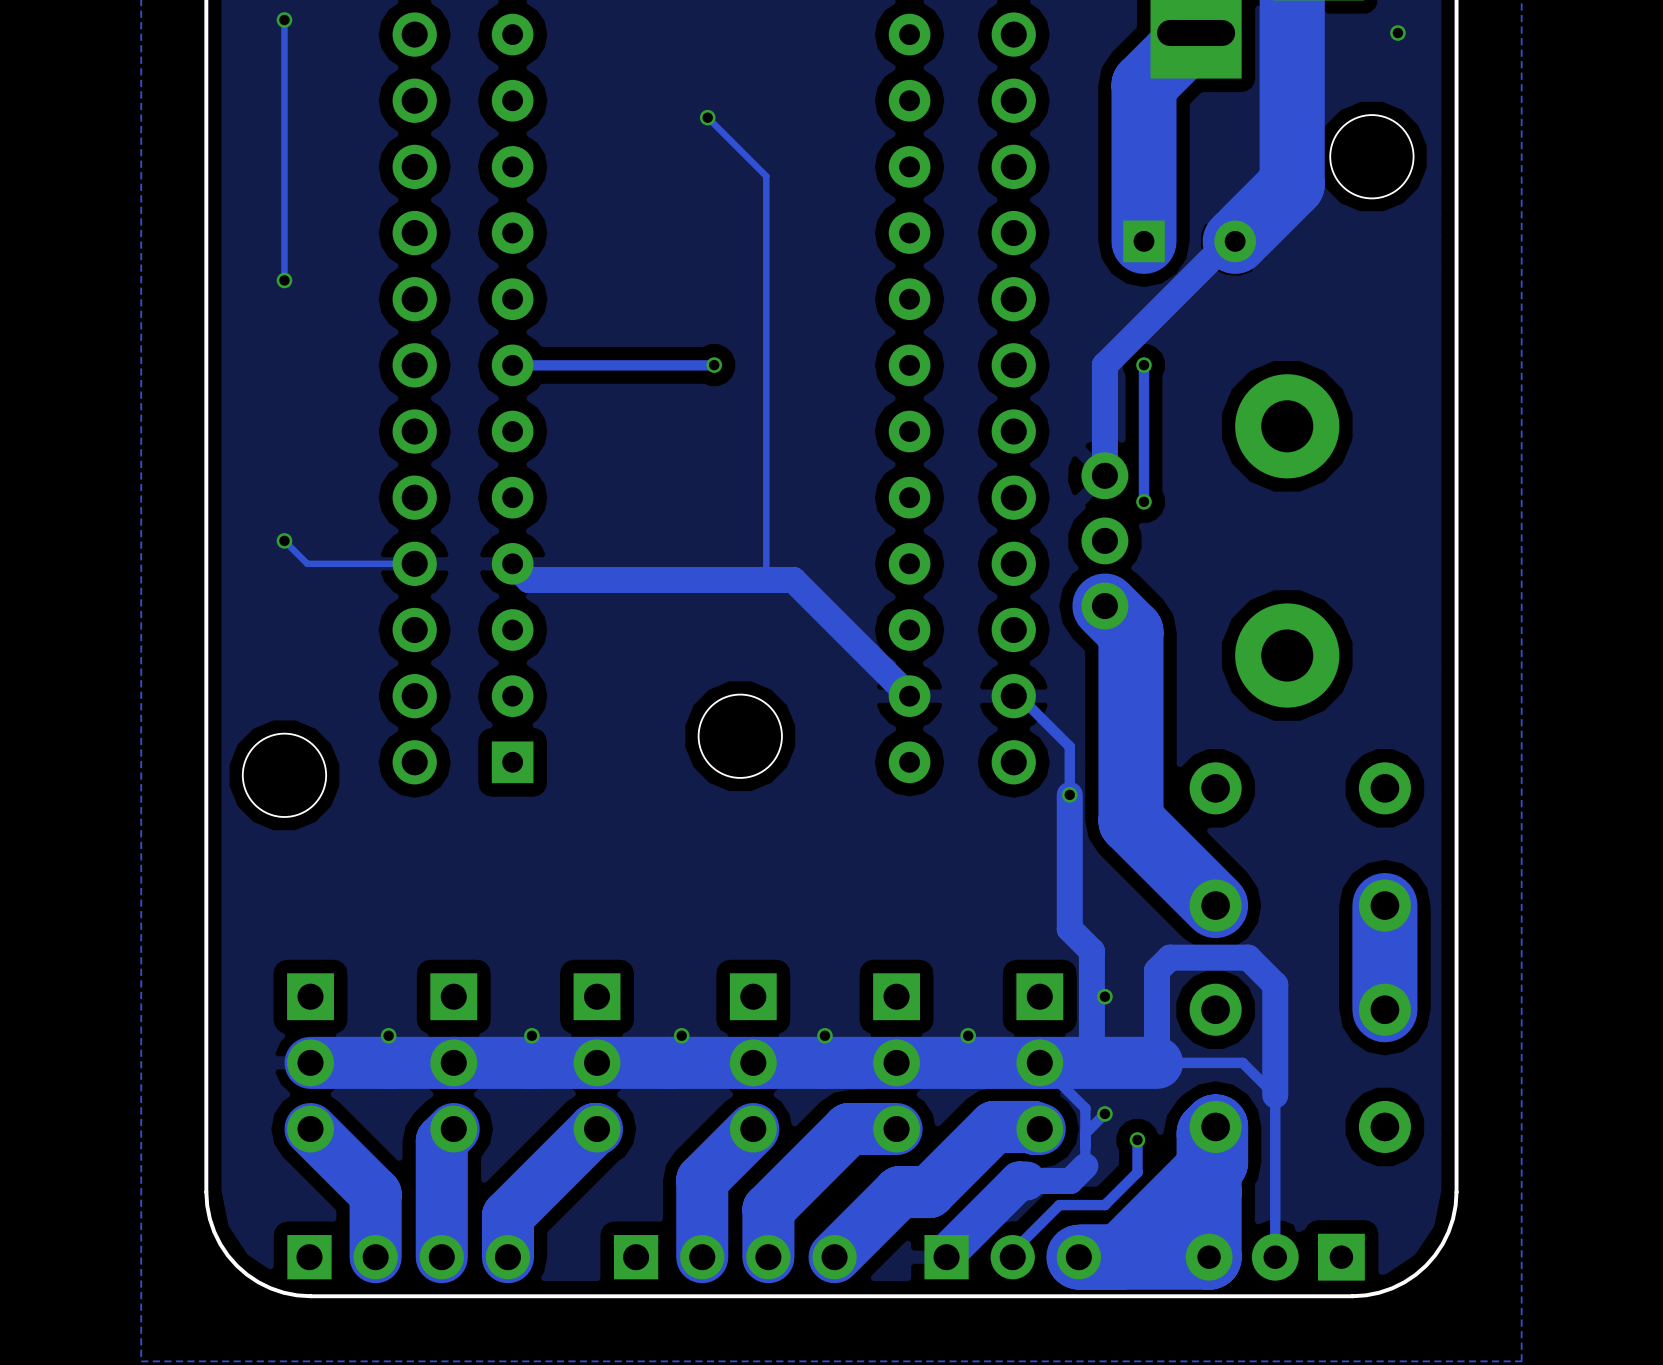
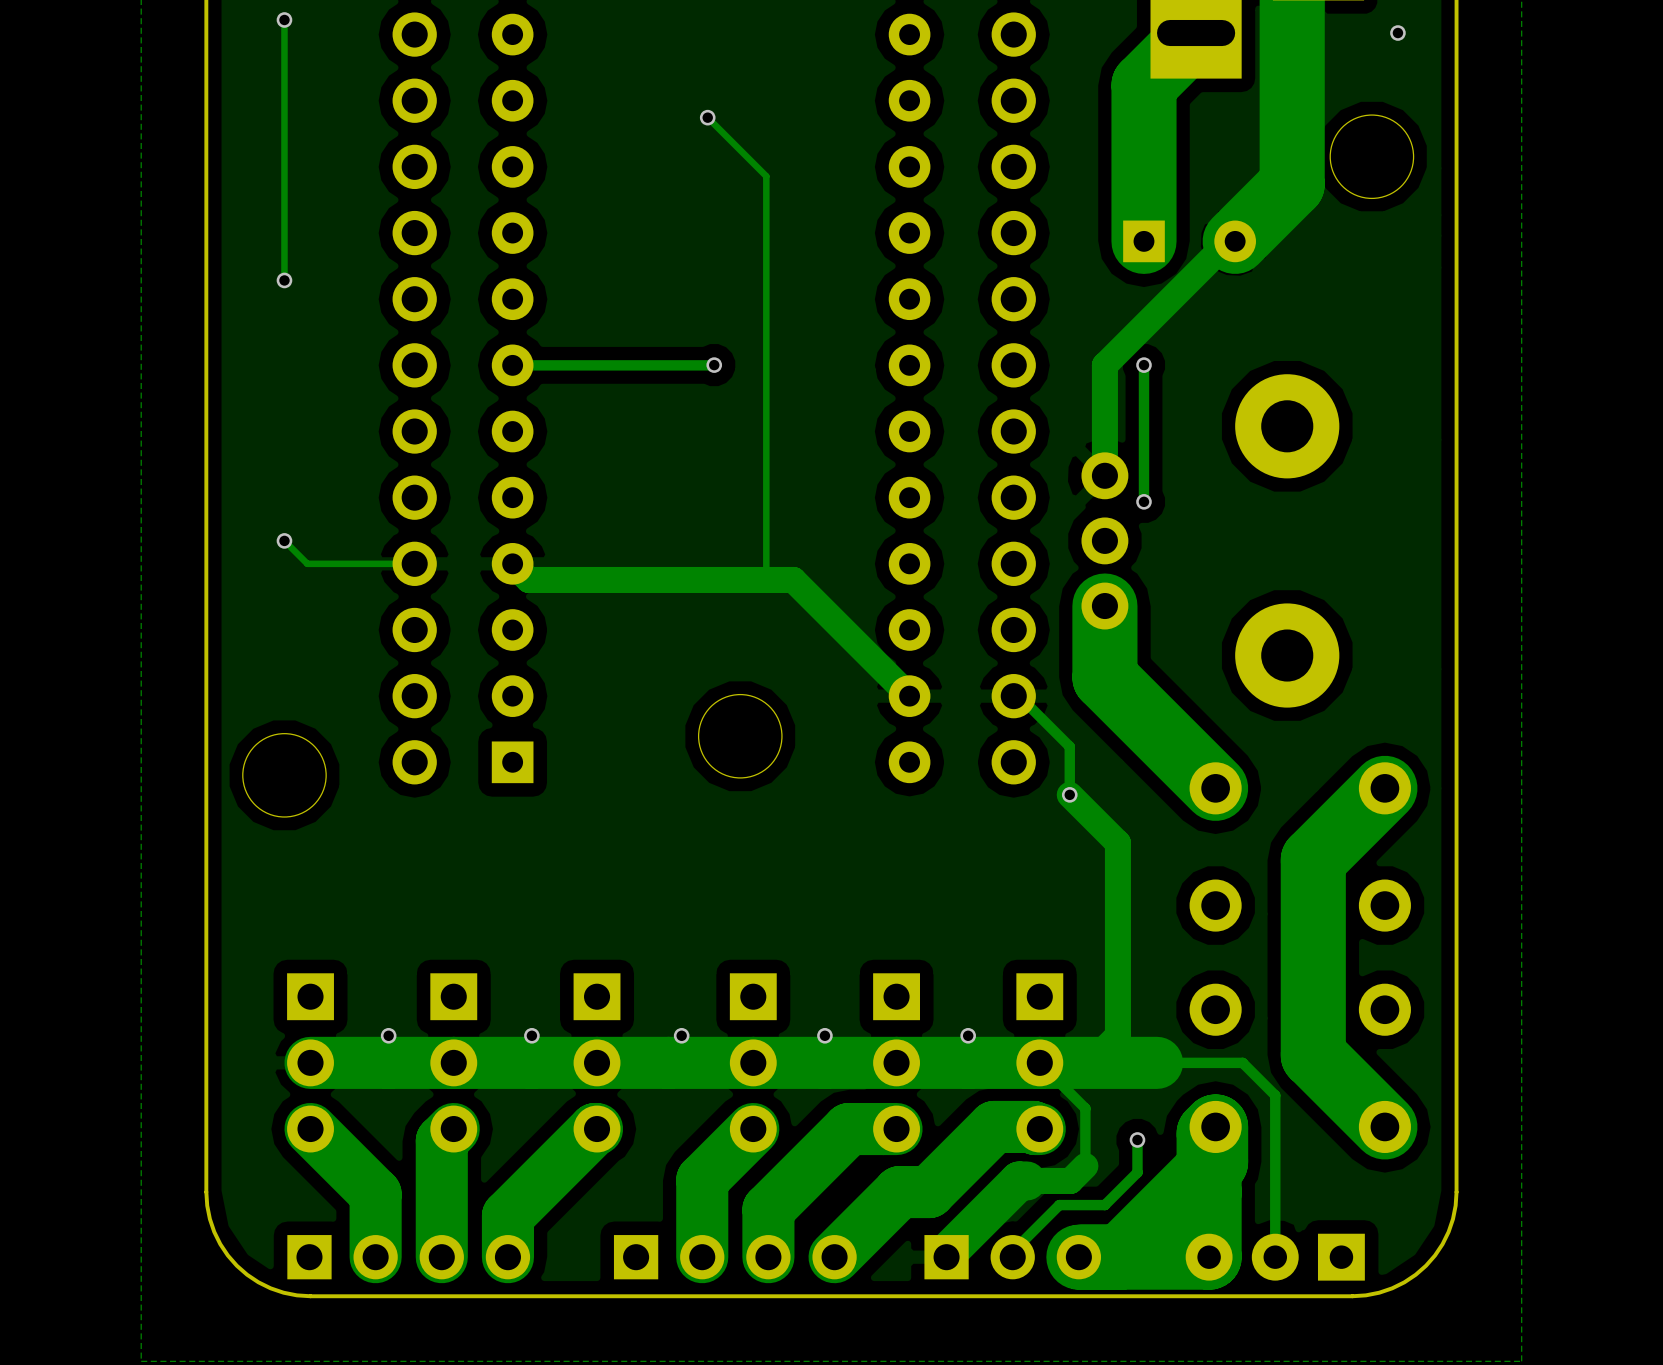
track: (1104, 606) (1130, 632) (1130, 820) (1215, 905) -> (1104, 606) (1104, 677) (1215, 788)
track: none -> (1384, 788) (1313, 859) (1313, 1055) (1384, 1126)
track: (1069, 794) (1069, 929) (1091, 951) (1091, 1061) -> (1069, 794) (1117, 843) (1117, 1035) (1091, 1061)
track: (1384, 905) (1384, 1009) -> none
via: (1104, 996) -> none
track: (1157, 1062) (1157, 970) (1170, 957) (1248, 957) (1275, 984) (1275, 1095) -> none
track: (1104, 1113) (1085, 1133) -> none
via: (1104, 1113) -> none

